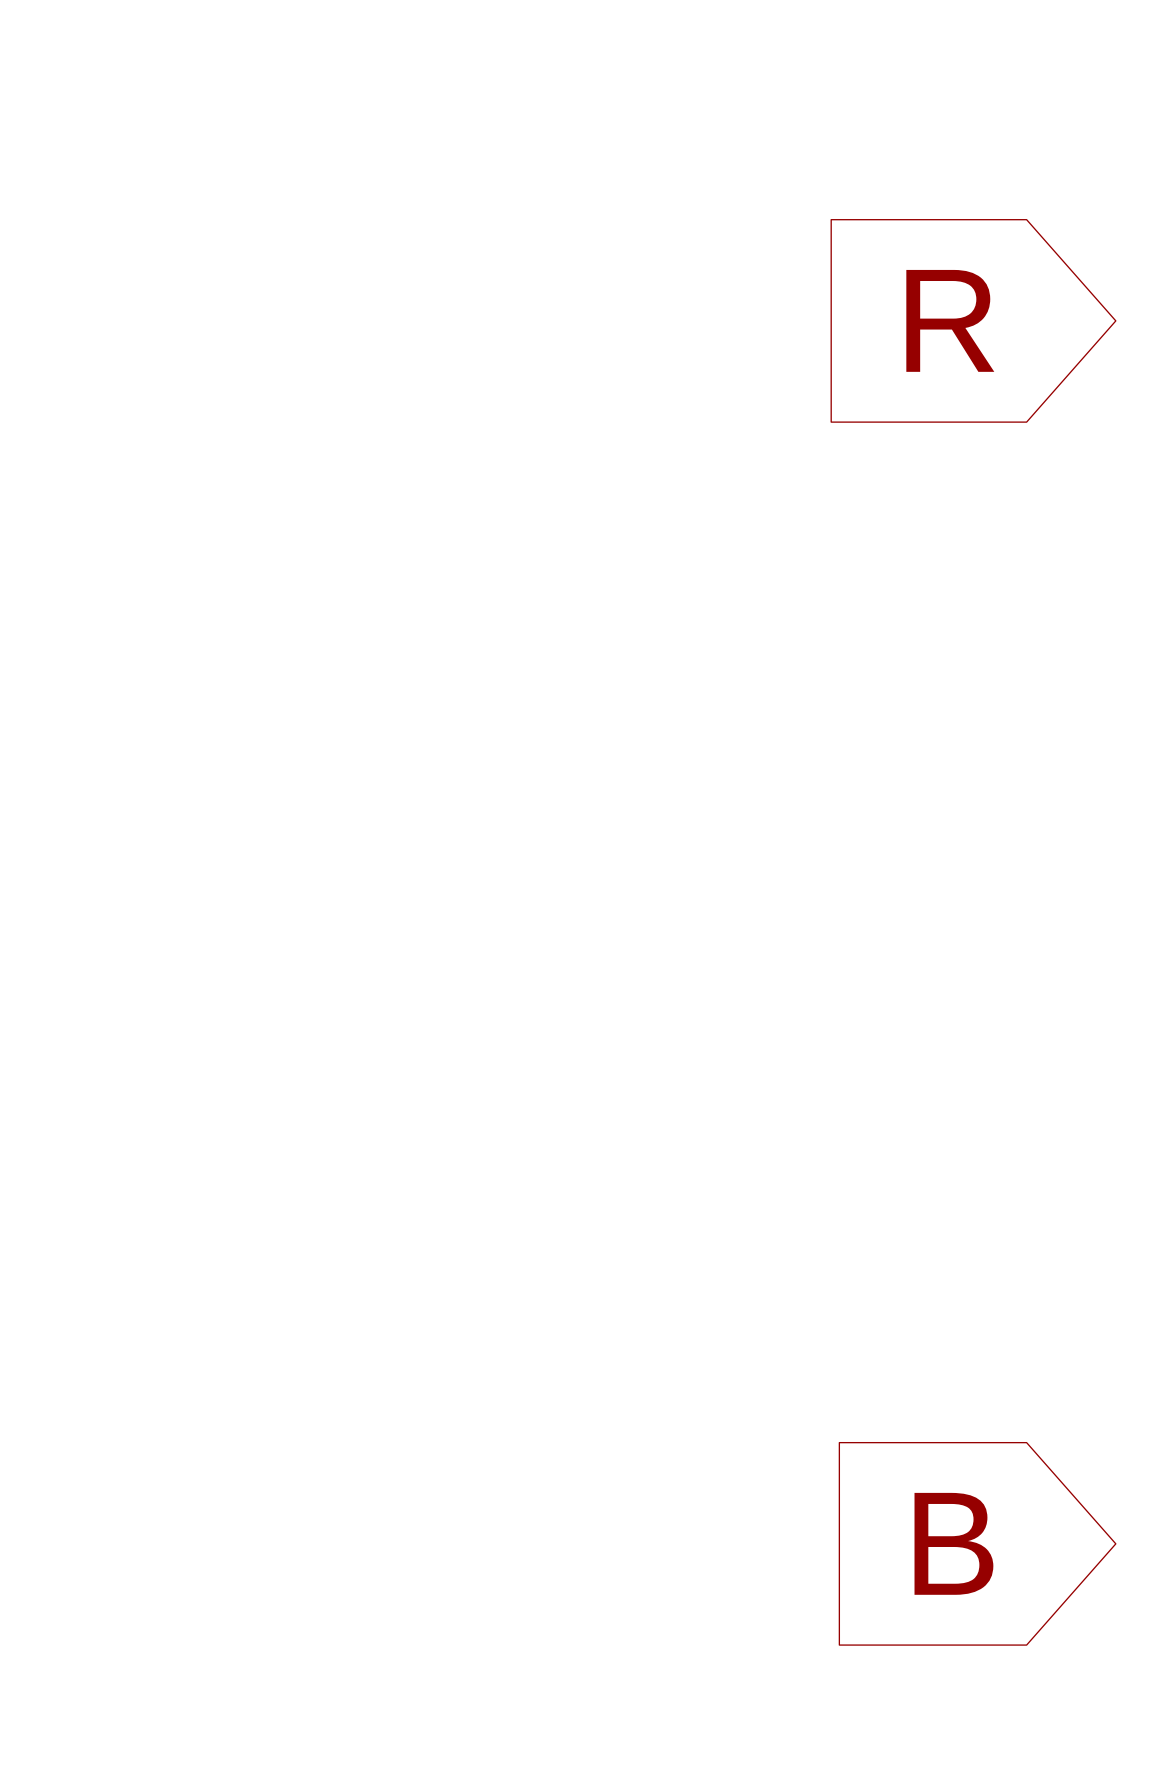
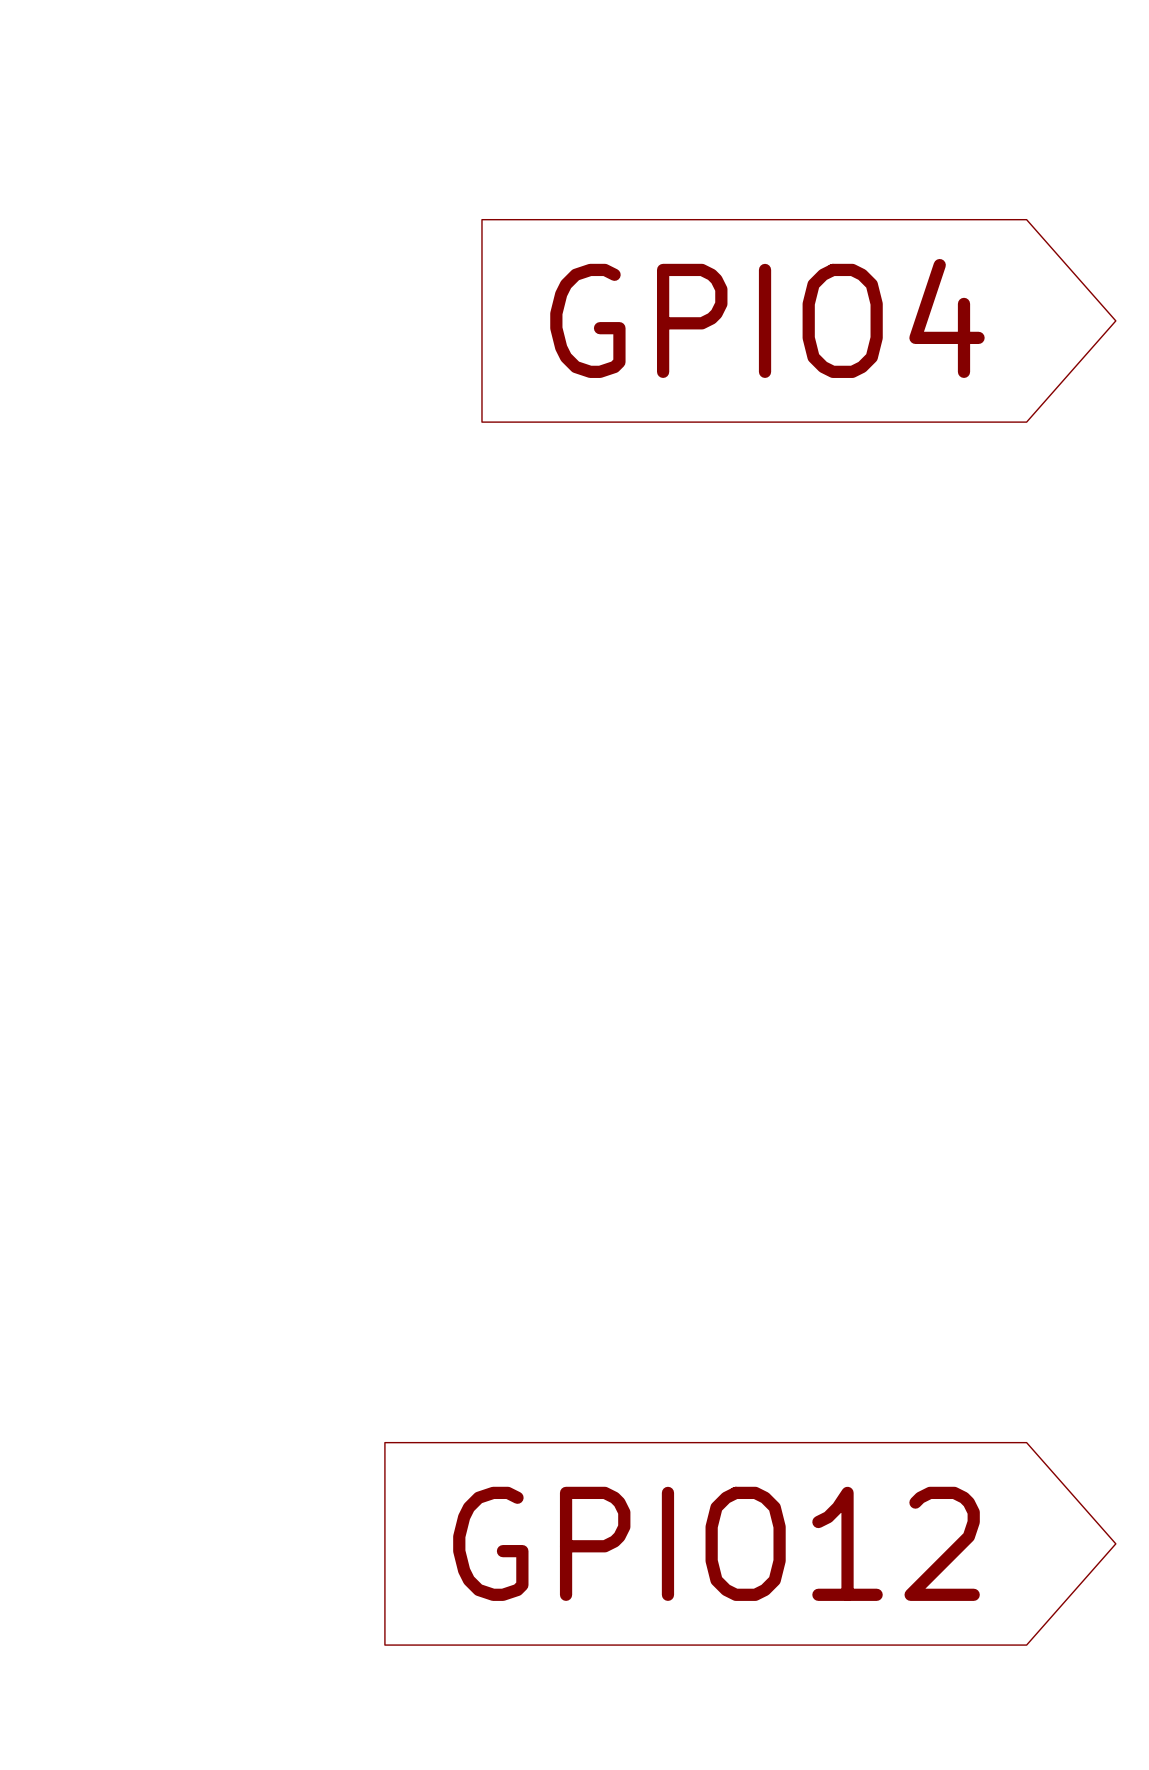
global label: R (950, 320) -> GPIO4 (767, 318)
global label: B (953, 1543) -> GPIO12 (716, 1543)

